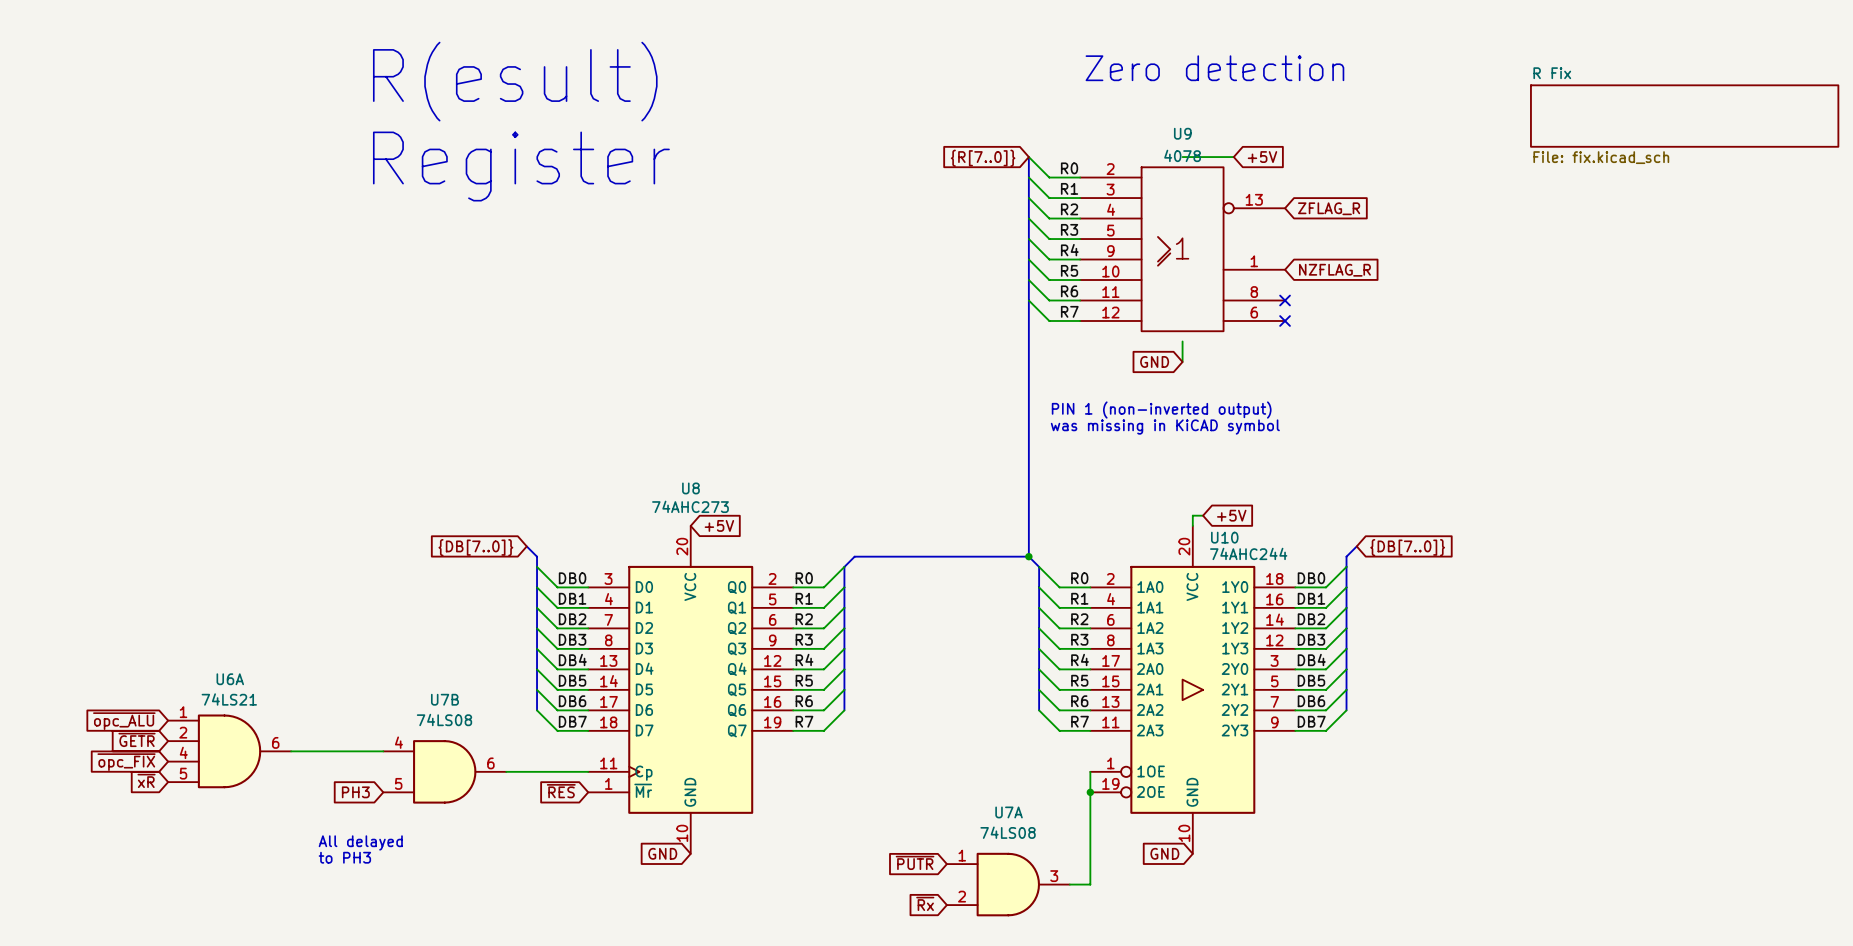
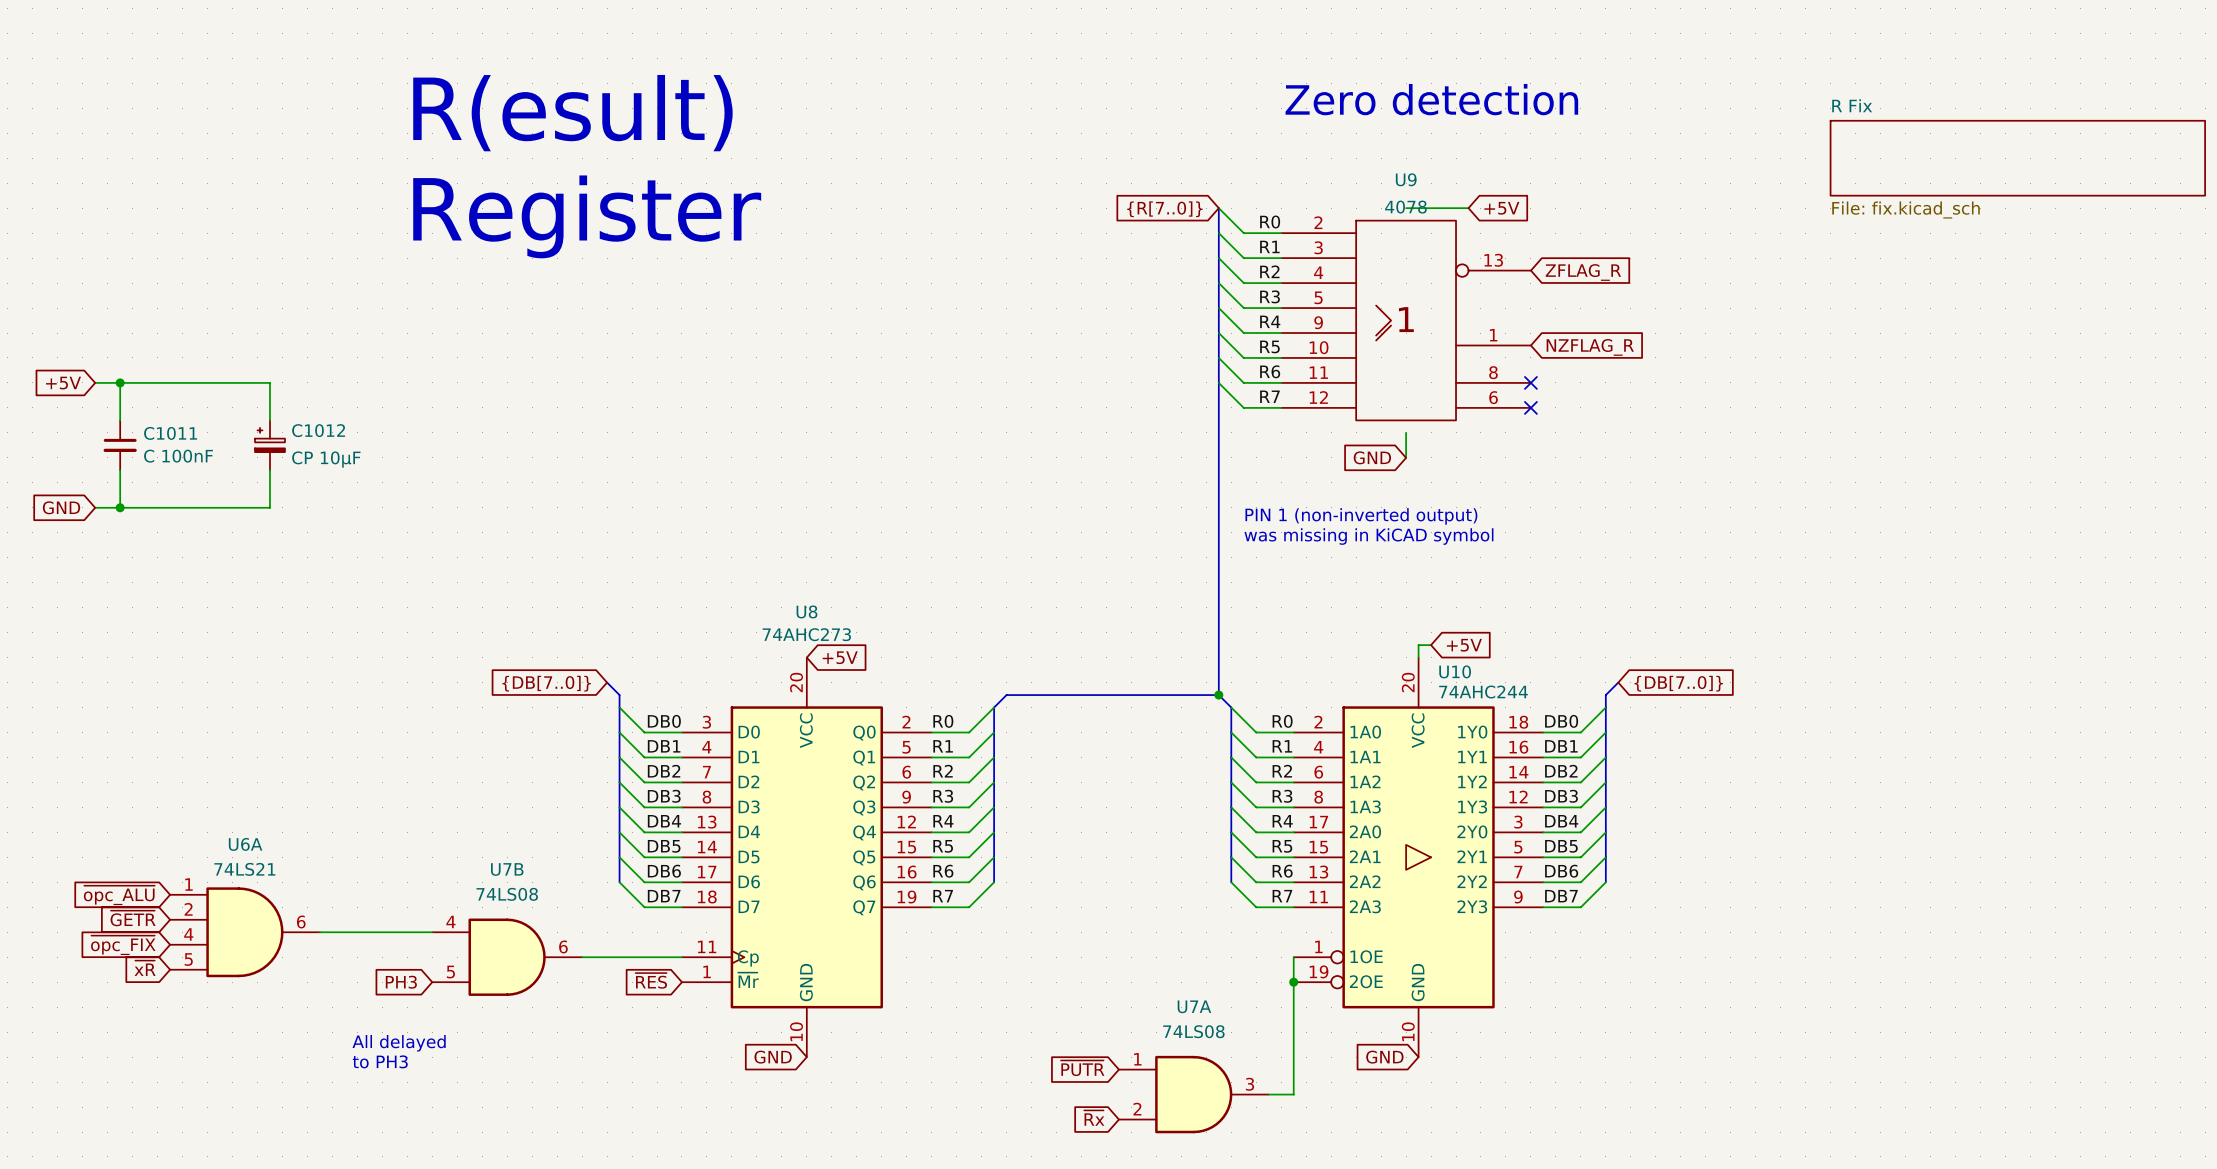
global label: none -> +5V (63, 383)
wire: none -> (95, 382) (269, 382) (269, 420)
wire: none -> (120, 382) (120, 420)
junction: none -> (120, 382)
C1011: none -> C 100nF (120, 445)
C1012: none -> CP 10μF (269, 445)
wire: none -> (120, 470) (120, 507)
wire: none -> (269, 470) (269, 507) (95, 507)
global label: none -> GND (61, 507)
junction: none -> (120, 507)

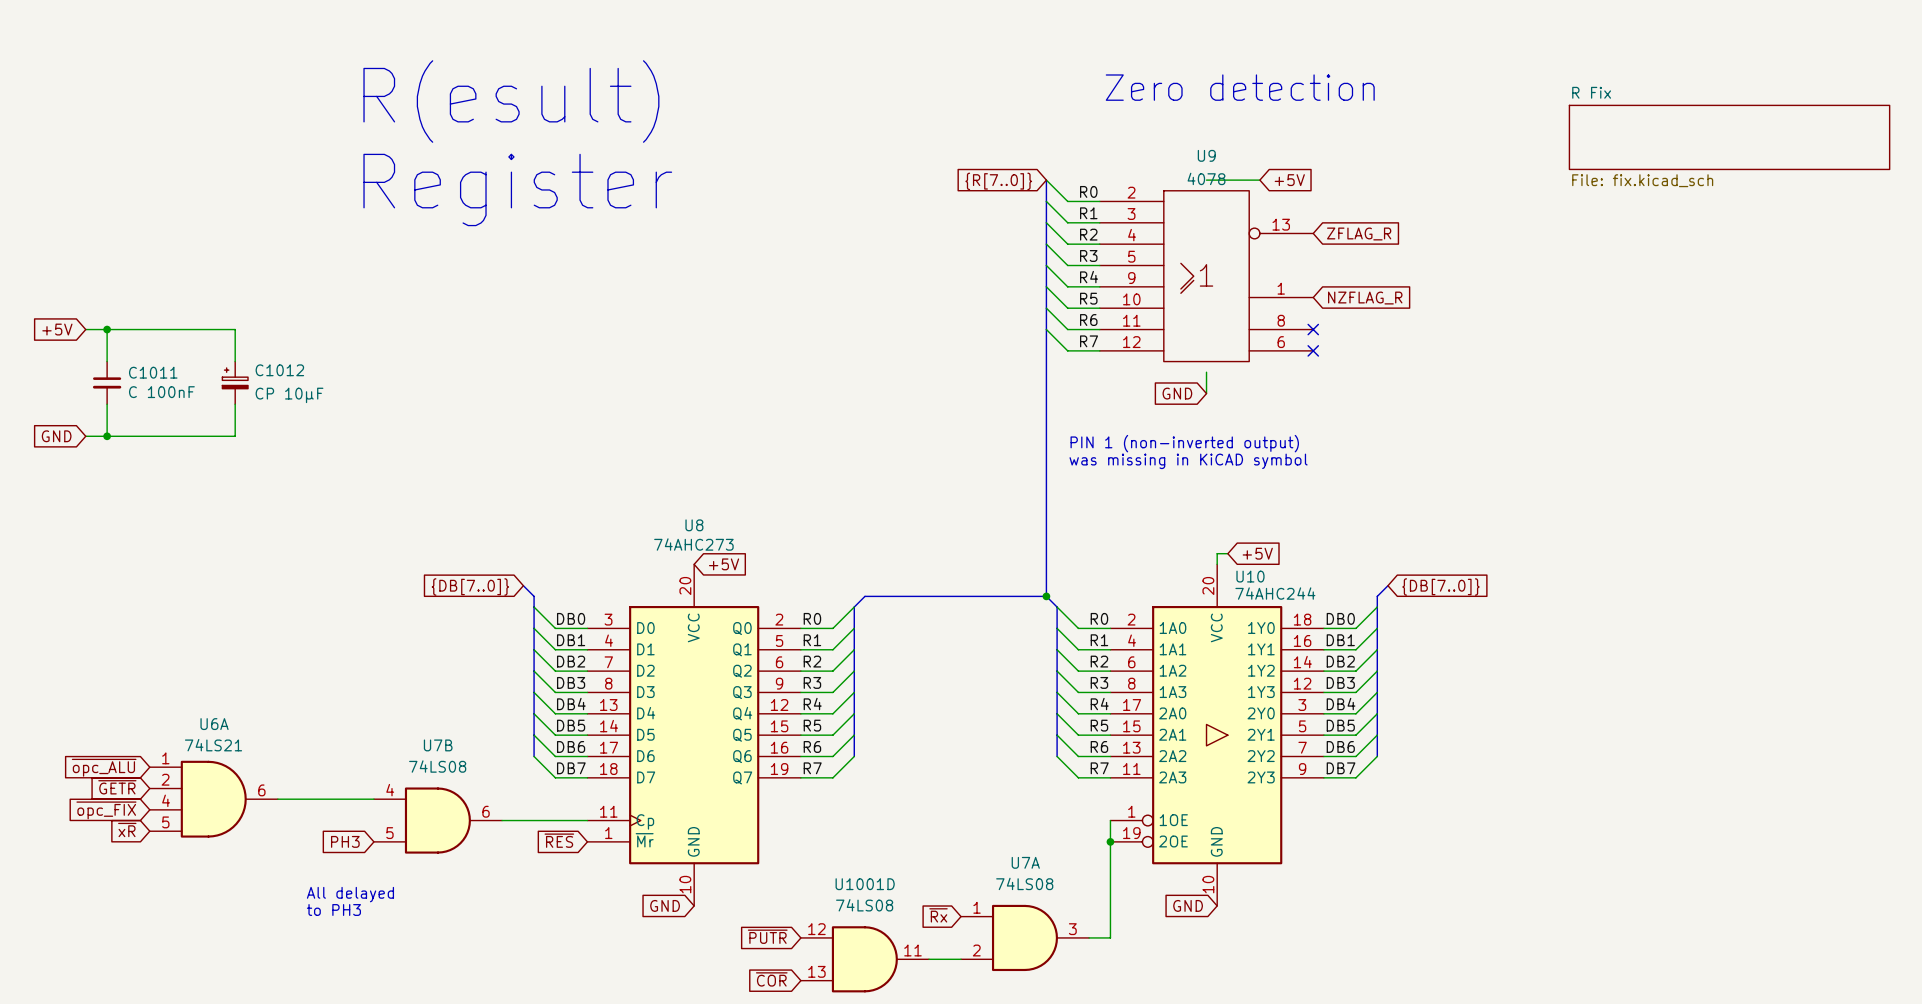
global label: ~{PUTR} (1082, 1068) -> ~{Rx} (938, 915)
global label: none -> ~{PUTR} (767, 936)
global label: ~{Rx} (1094, 1118) -> none
U1001D: none -> 74LS08 (864, 959)
wire: none -> (928, 959) (961, 959)
global label: none -> ~{COR} (771, 979)

